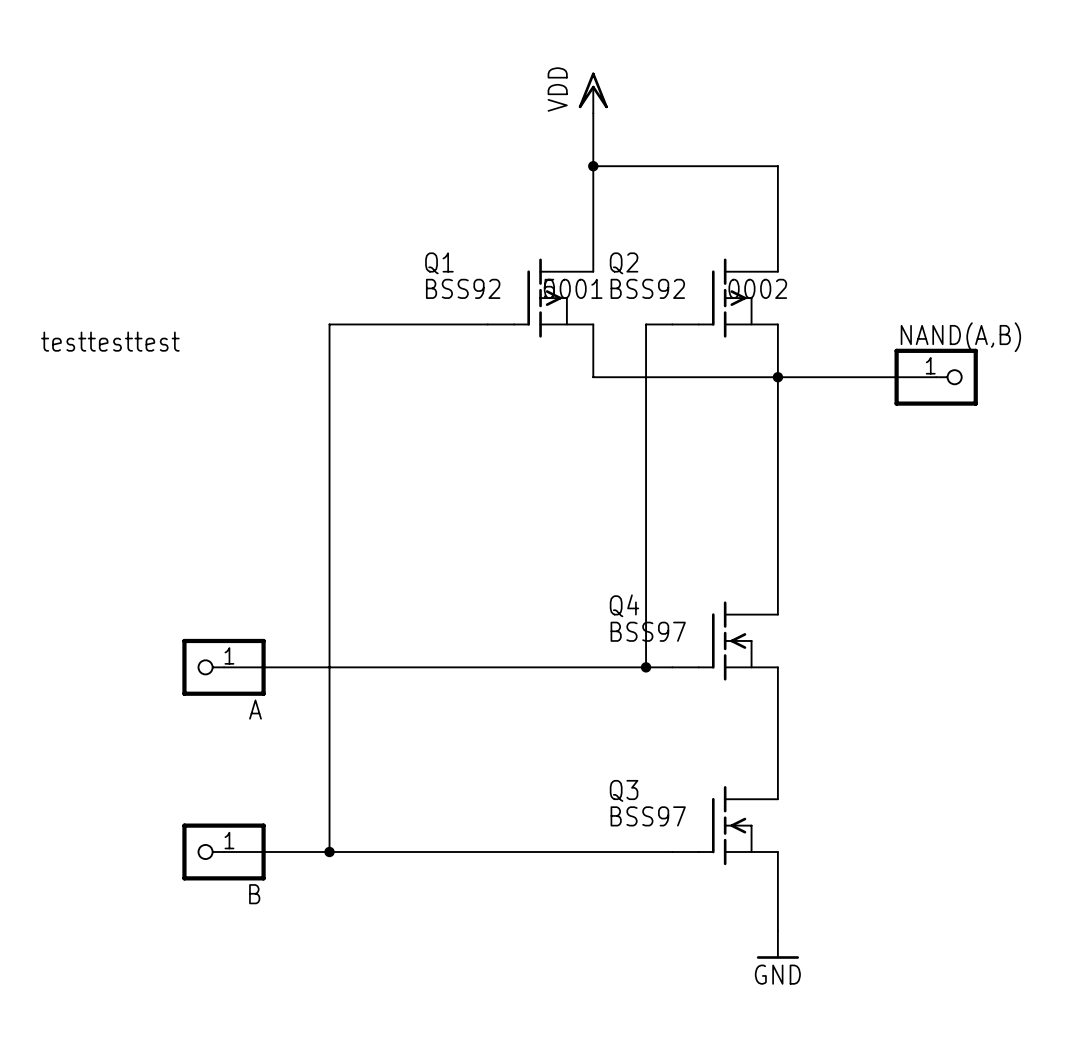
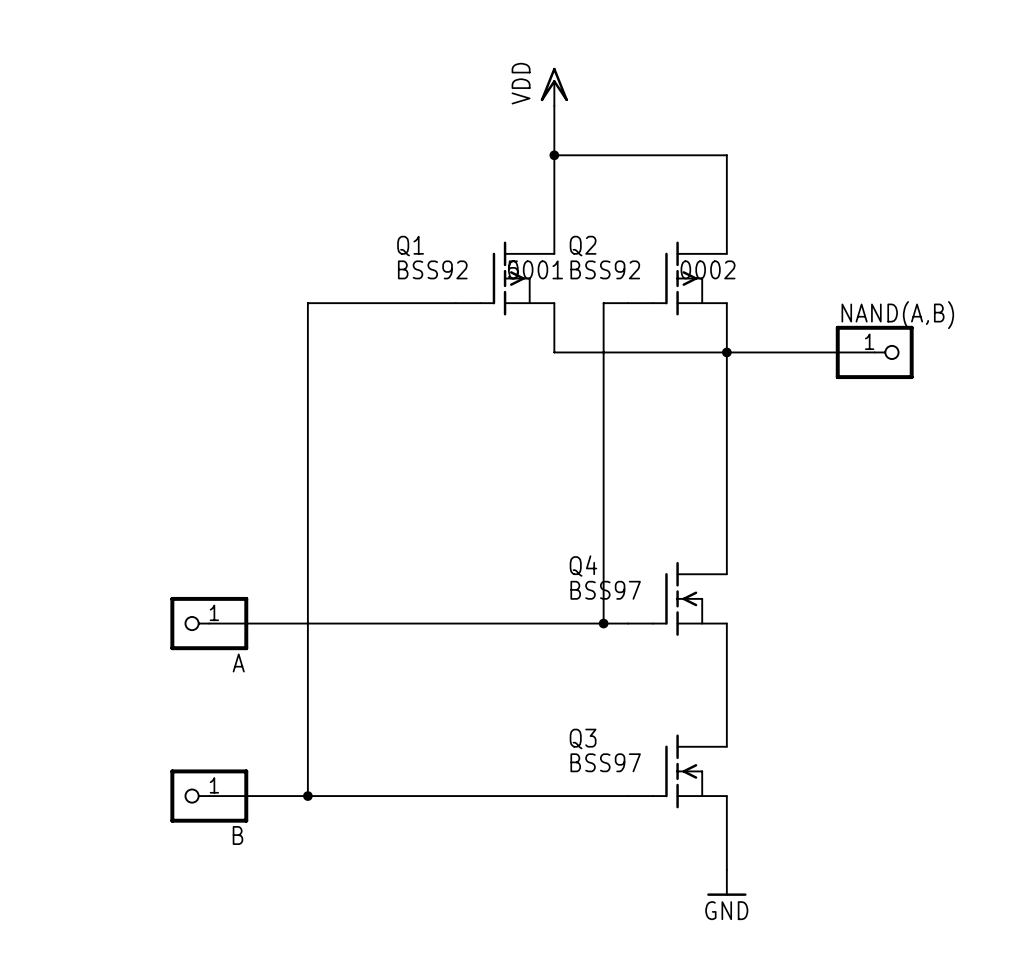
text: testtesttest (110, 341) -> none

